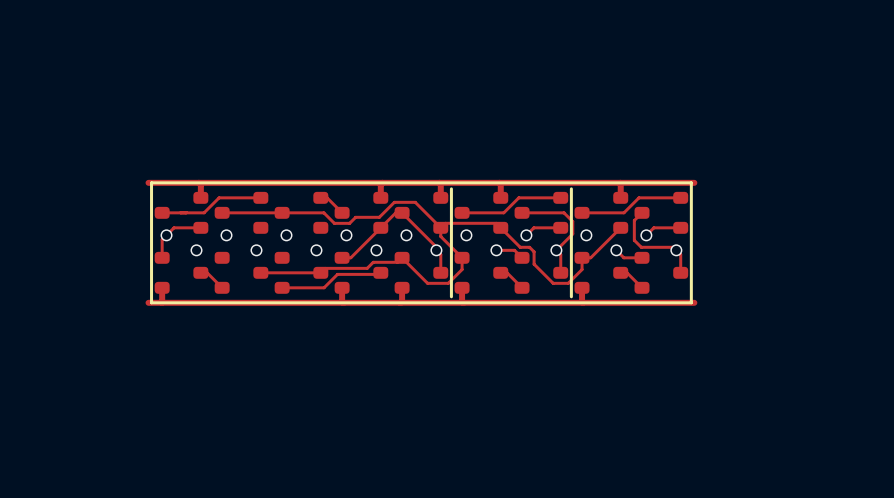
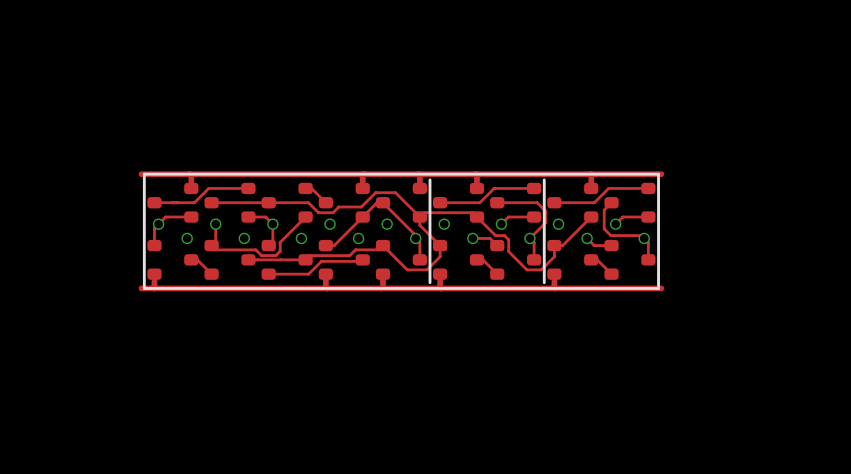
track: none -> (248, 217) (265, 217) (272, 224) (272, 241) (268, 245)
track: none -> (305, 217) (280, 242) (280, 251) (275, 255) (261, 255) (255, 249) (215, 249) (211, 245) (215, 241) (215, 224)

